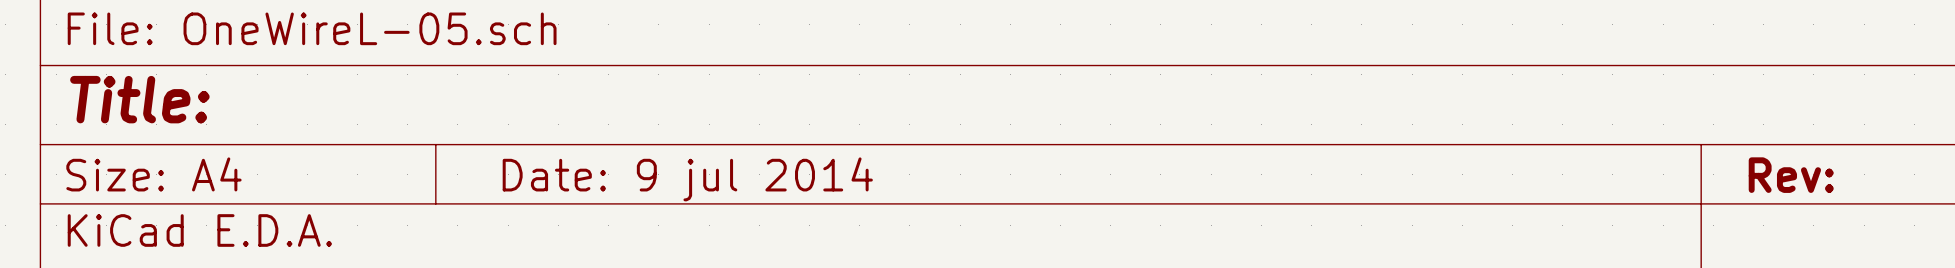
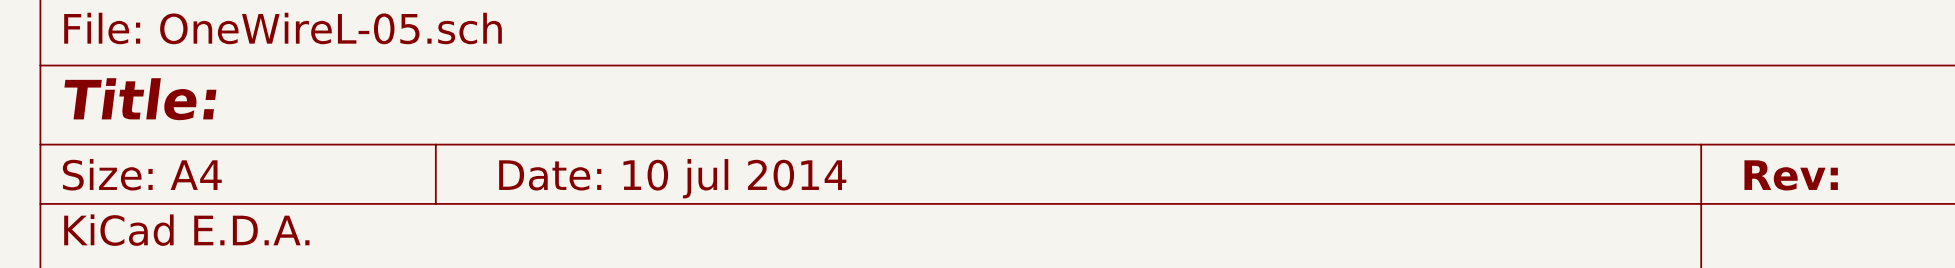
title block: Date: 9 jul 2014 (687, 179) -> Date: 10 jul 2014 (672, 178)

